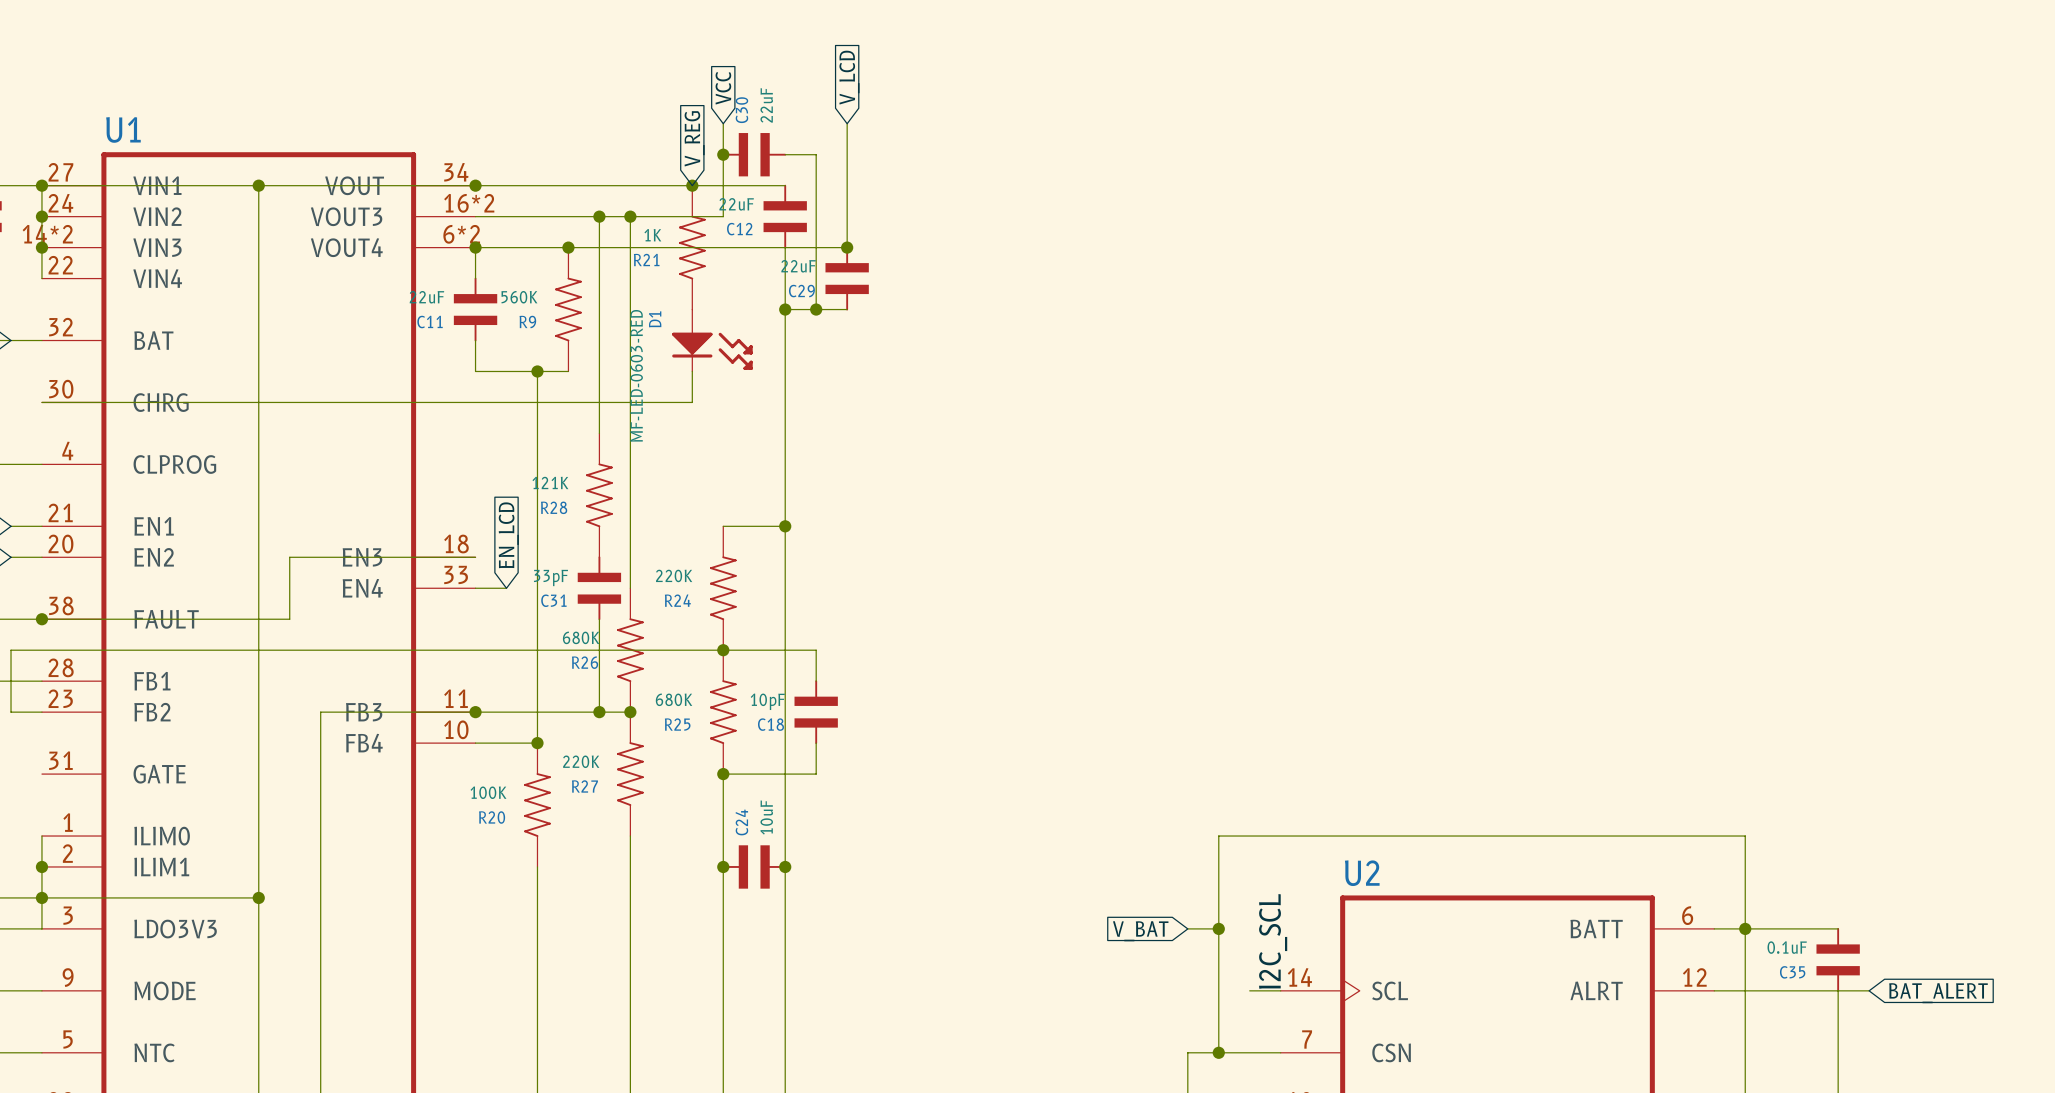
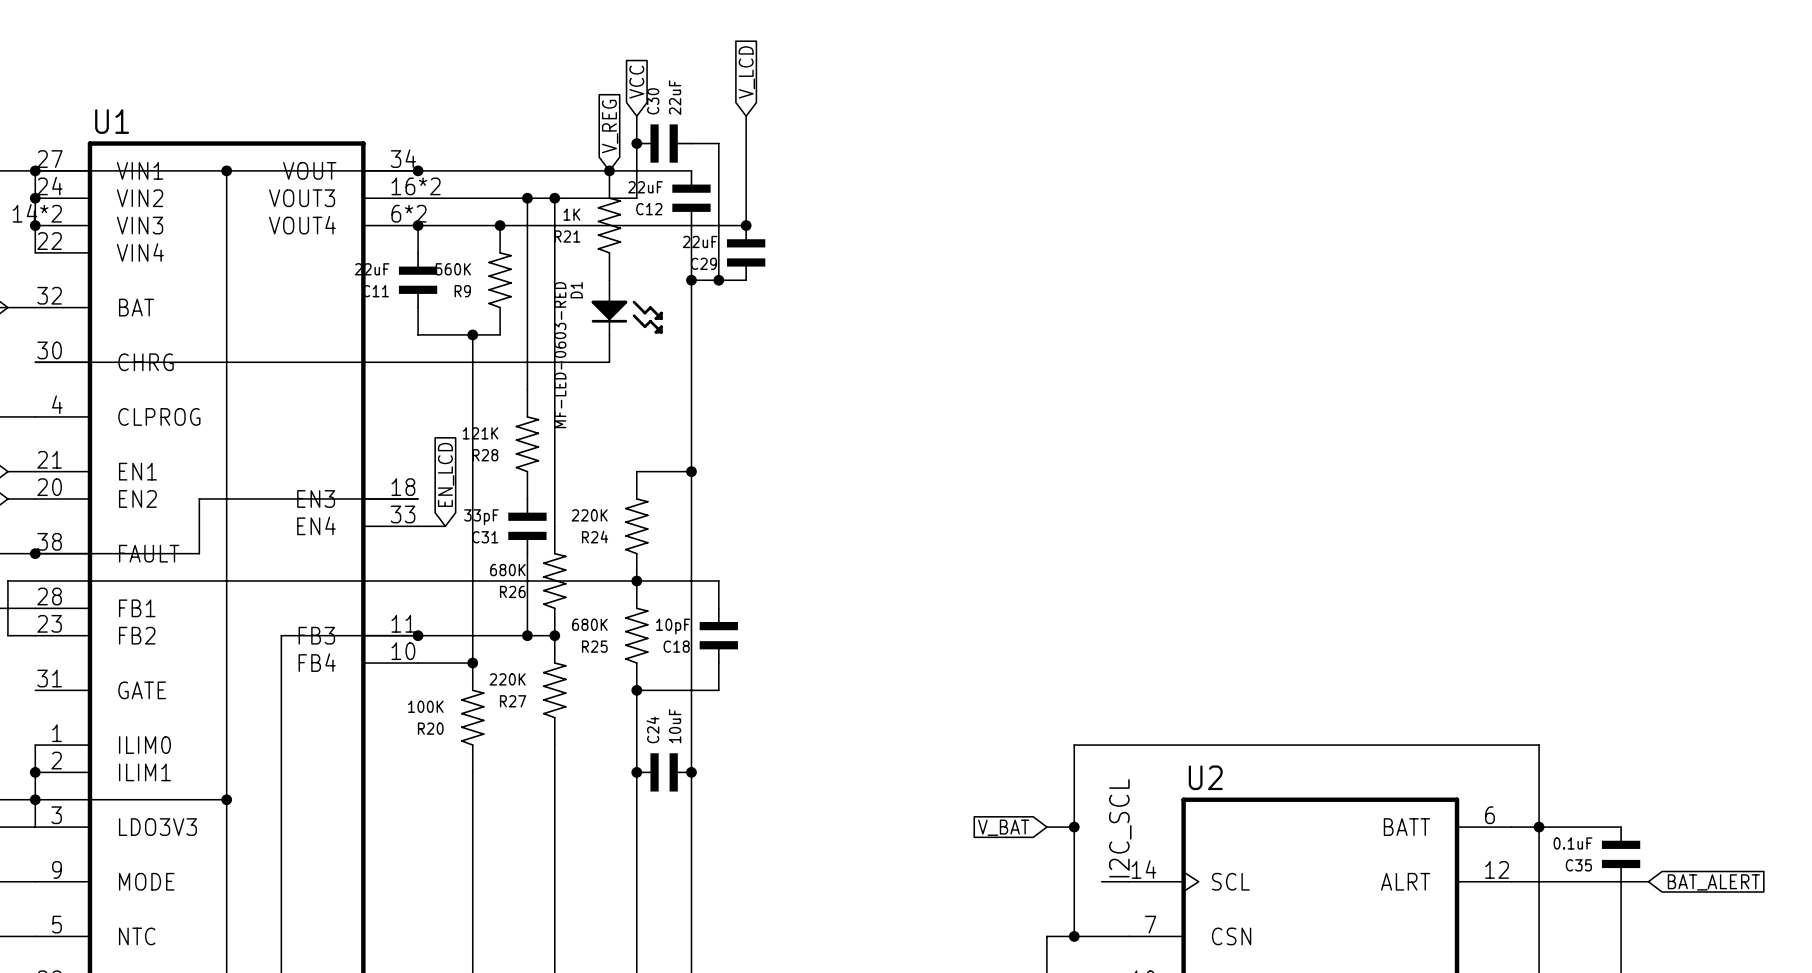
wire: (289, 557) (289, 619) (227, 619) -> (254, 498) (199, 498) (199, 553)

